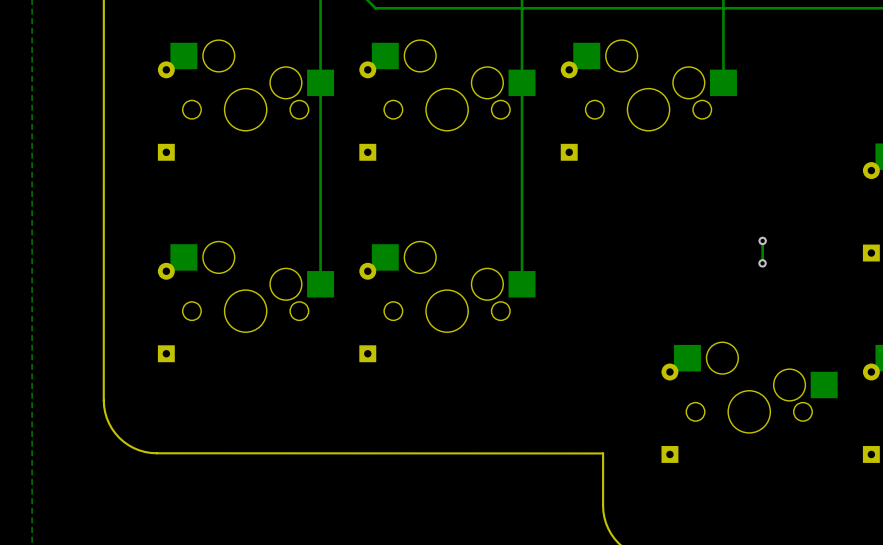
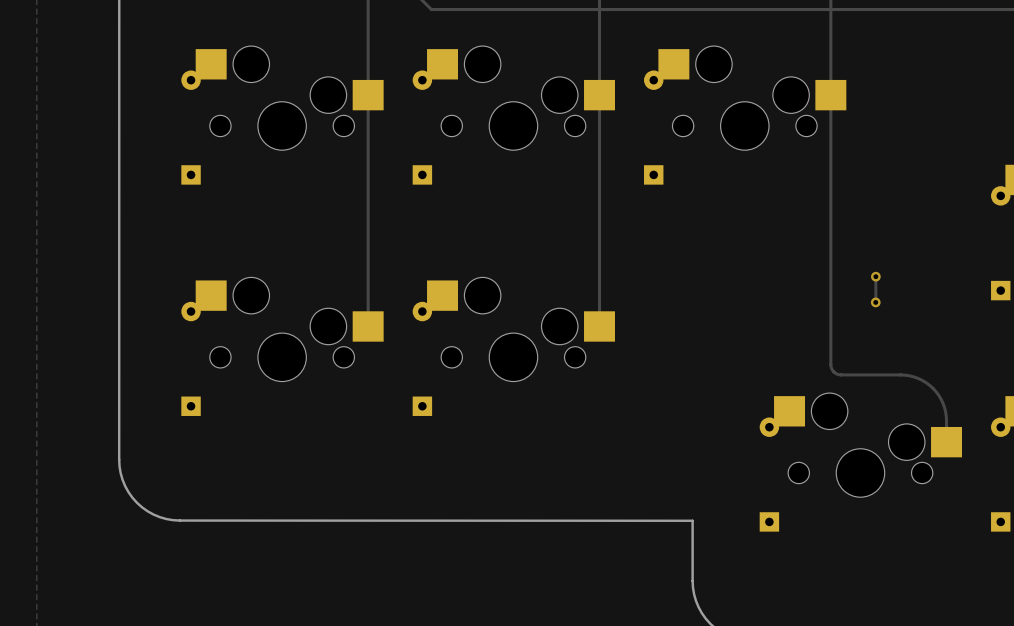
track: none -> (830, 95) (831, 367) (834, 372) (839, 374) (905, 375) (926, 382) (936, 391) (944, 407) (946, 442)

